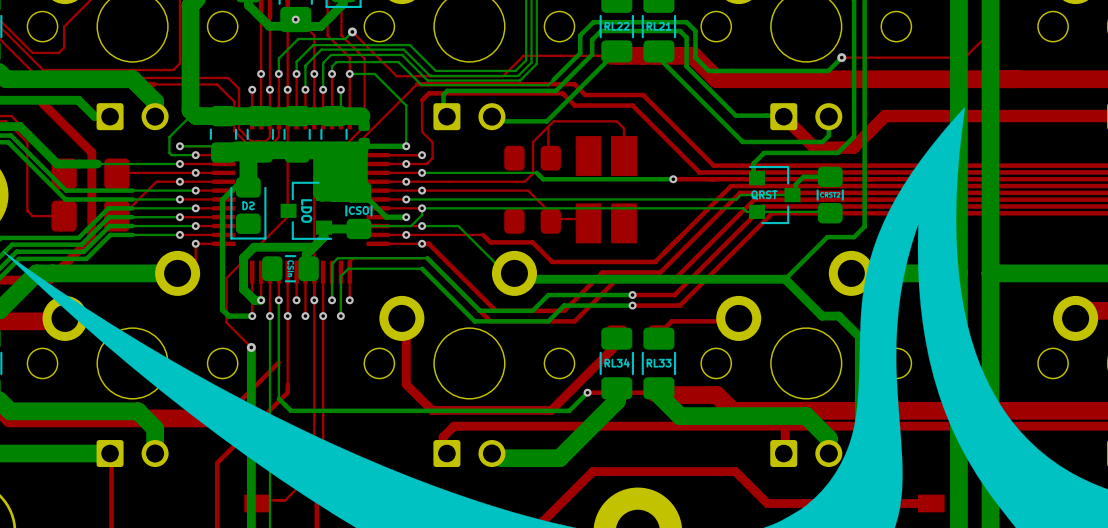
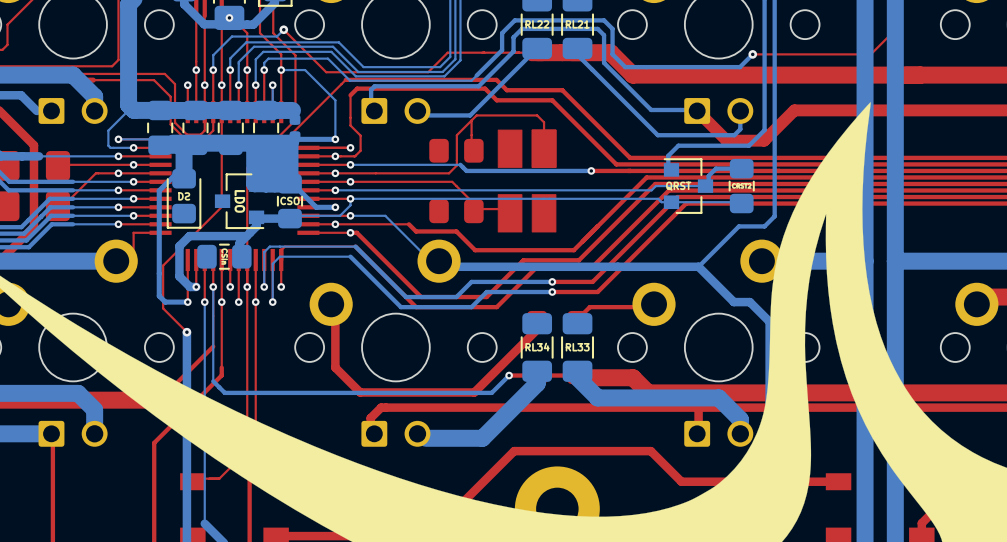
via: (195, 243) -> none

